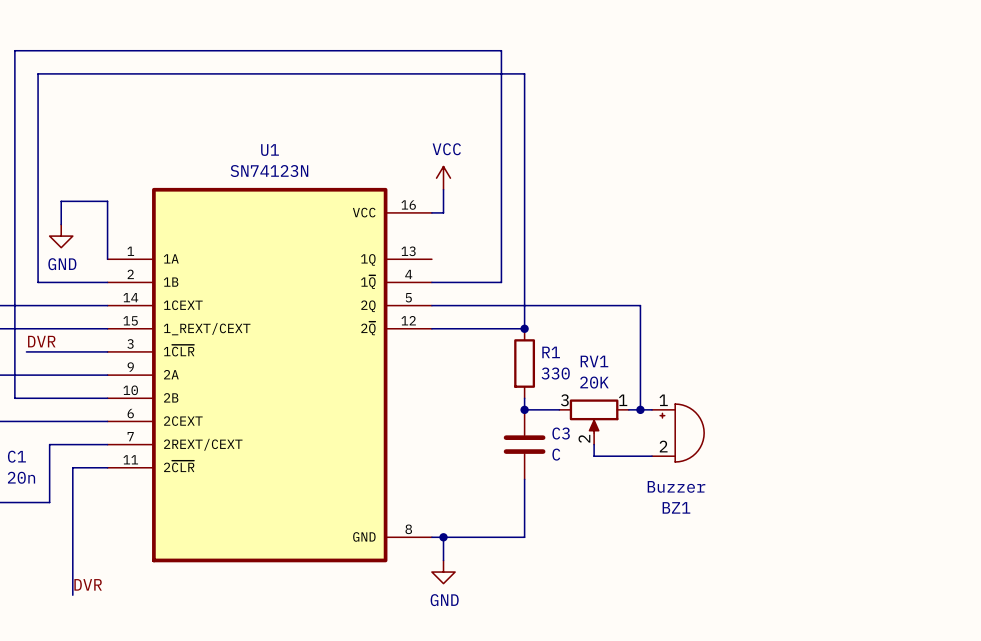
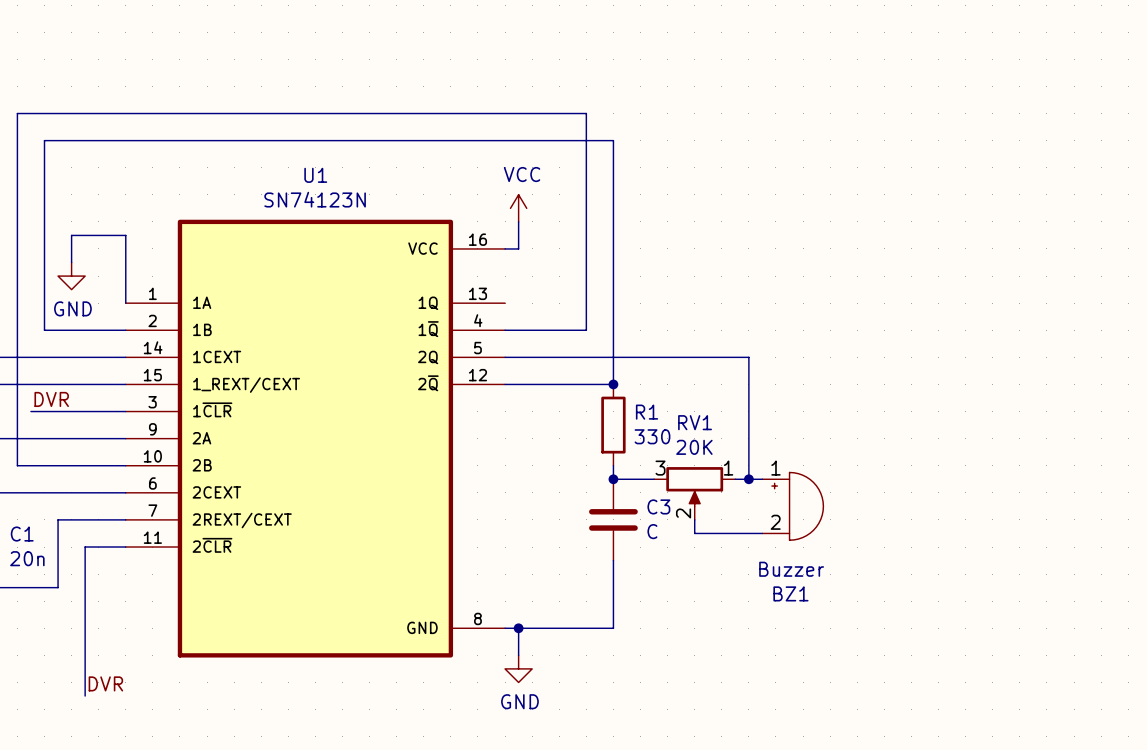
wire: (14, 97) (14, 50) (501, 50) (501, 97) -> (17, 113) (586, 113)
wire: (38, 120) (38, 73) (524, 73) (524, 120) -> (44, 140) (613, 140)

